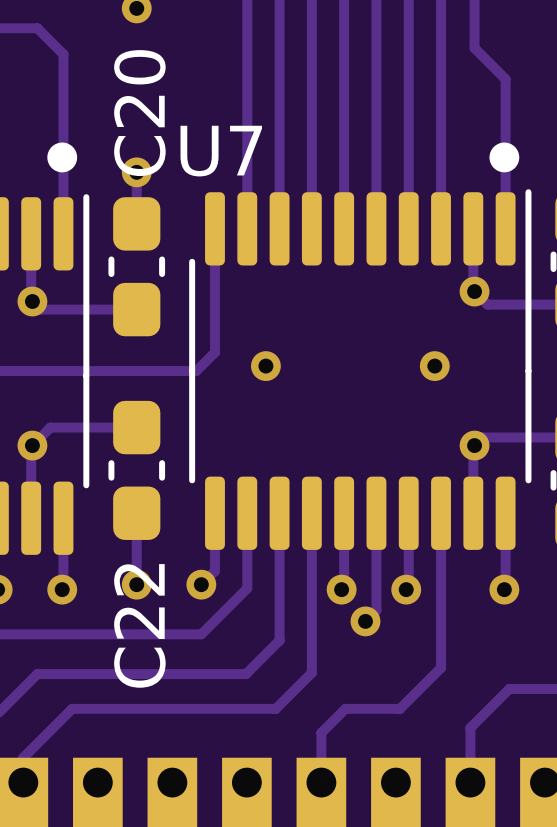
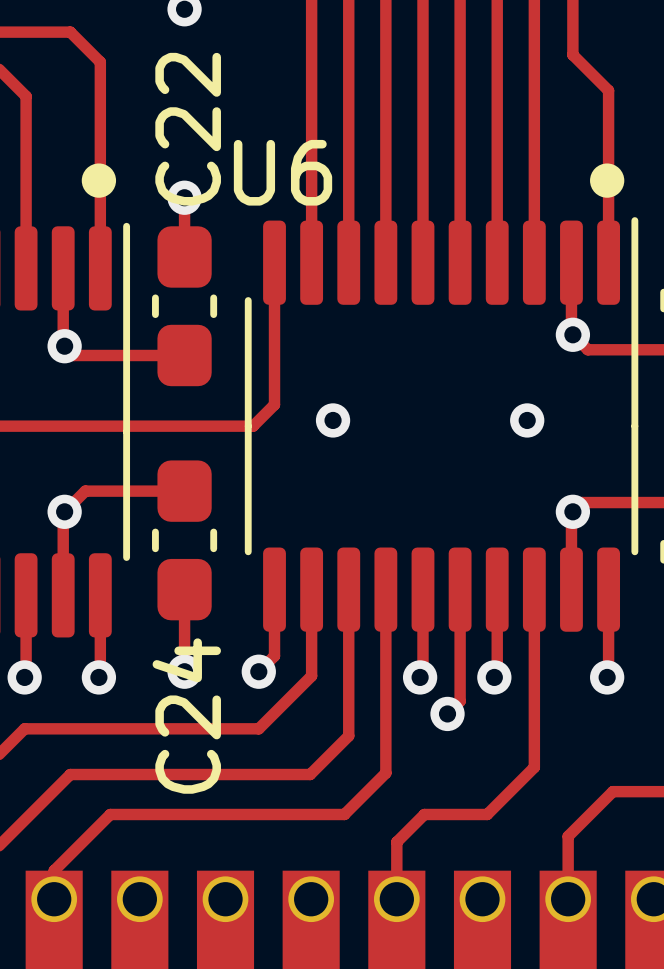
C20 name: C20 (139, 113) -> C22 (188, 129)
U7 name: U7 (221, 151) -> U6 (283, 172)
C22 name: C22 (139, 625) -> C24 (186, 716)

